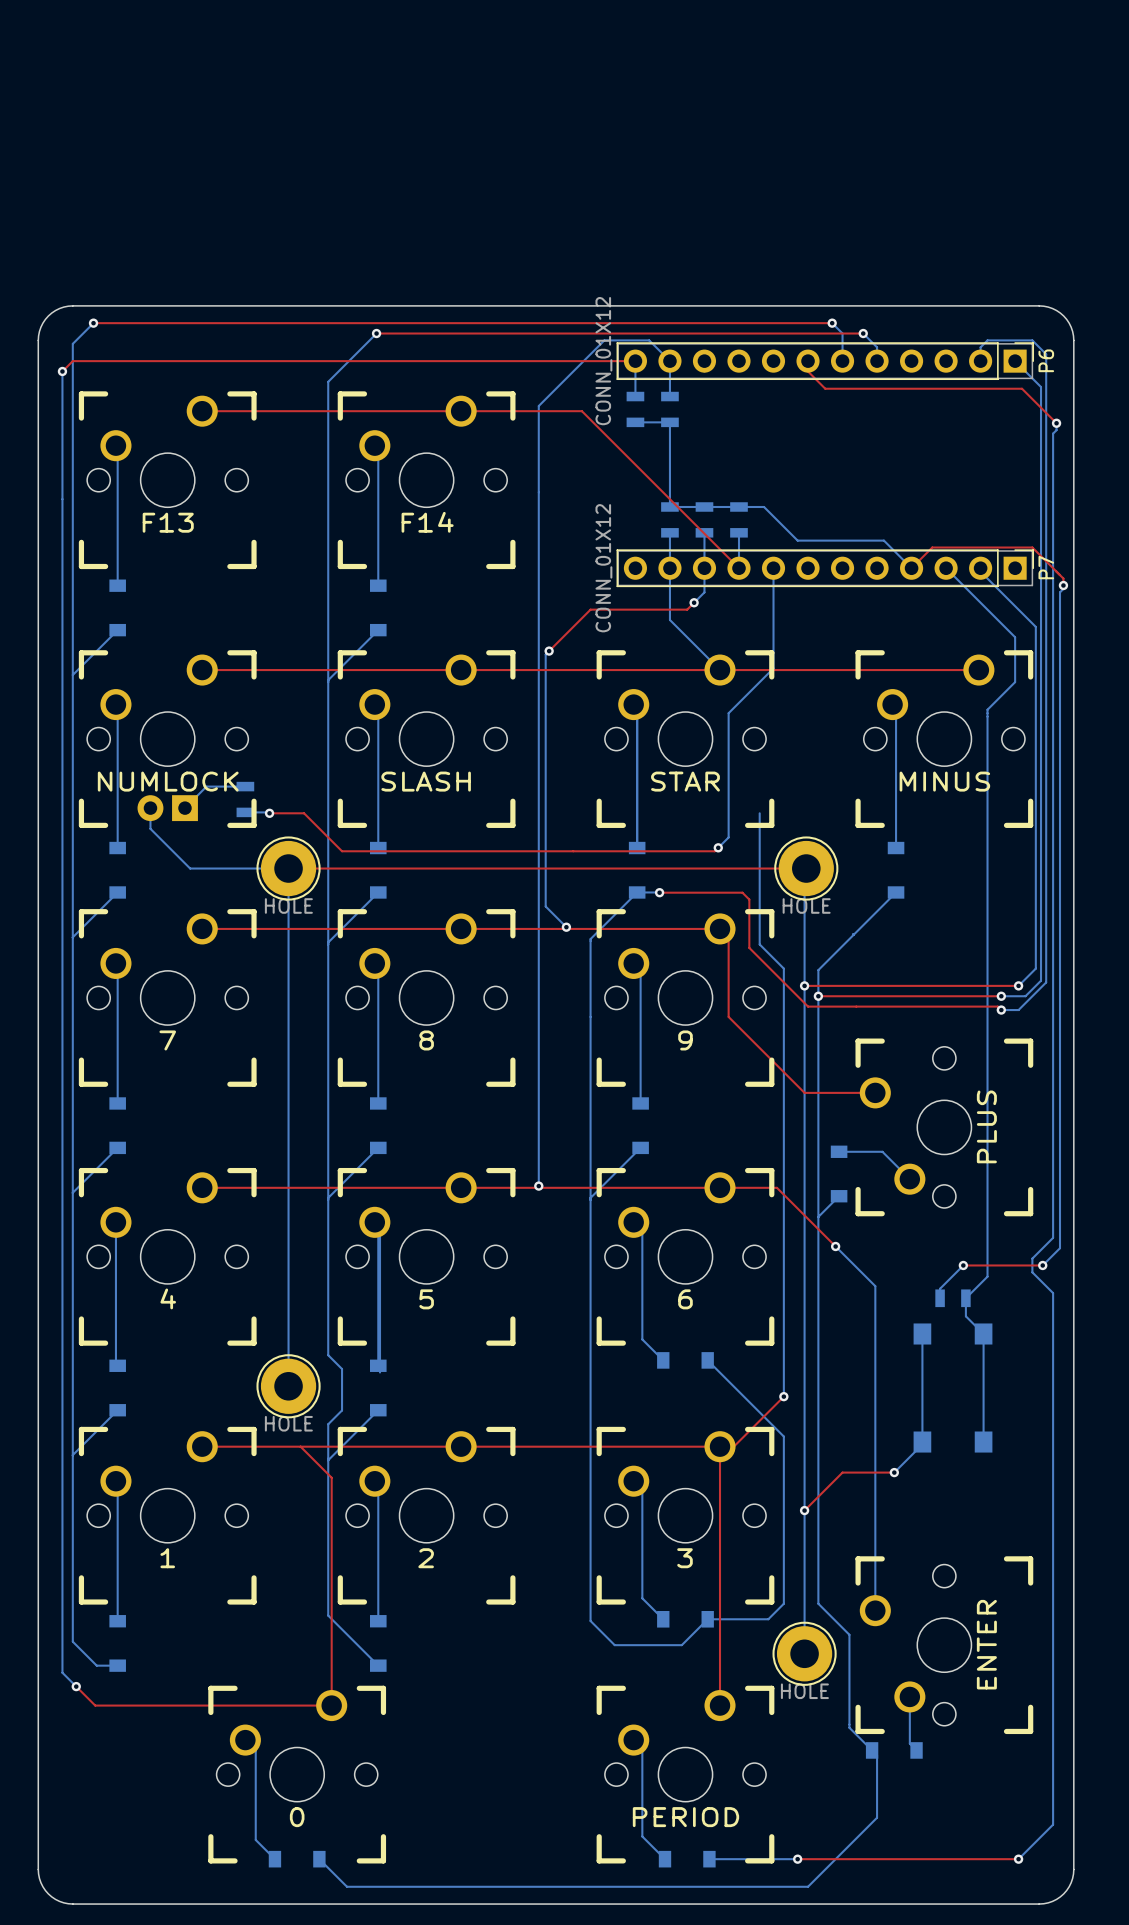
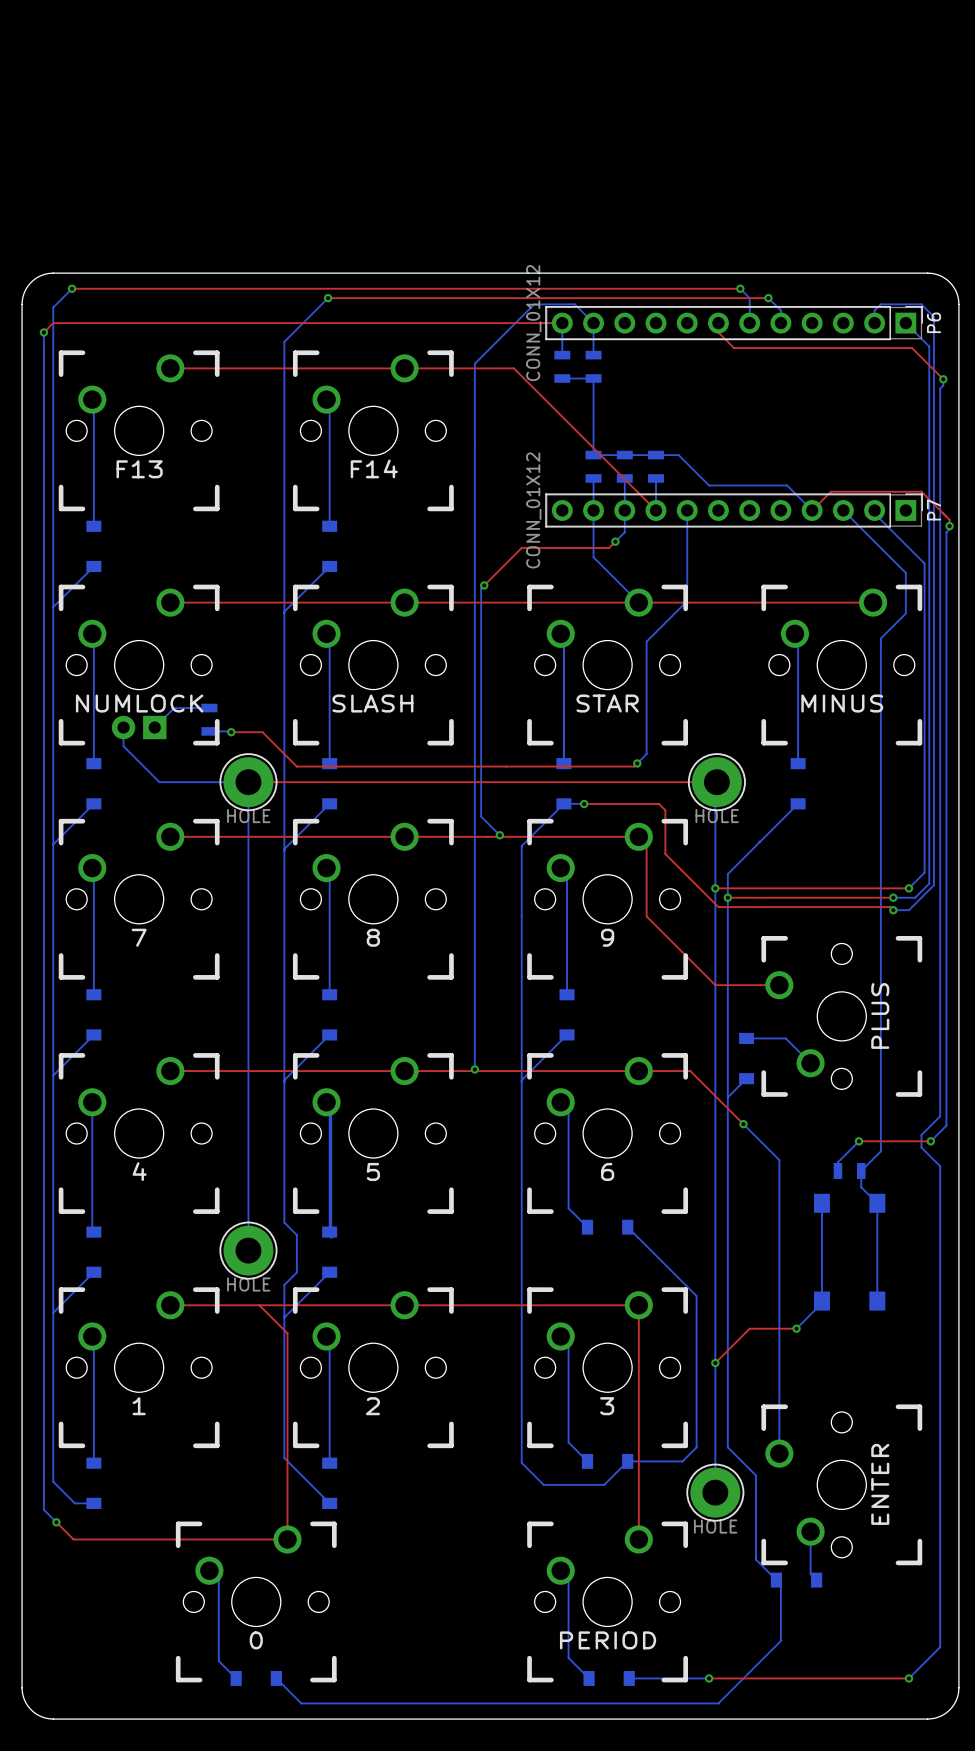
bottom track: (759, 813) (759, 944) (783, 968) (783, 1396) -> none
top track: (783, 1396) (733, 1446) -> none
via: (783, 1396) -> none

